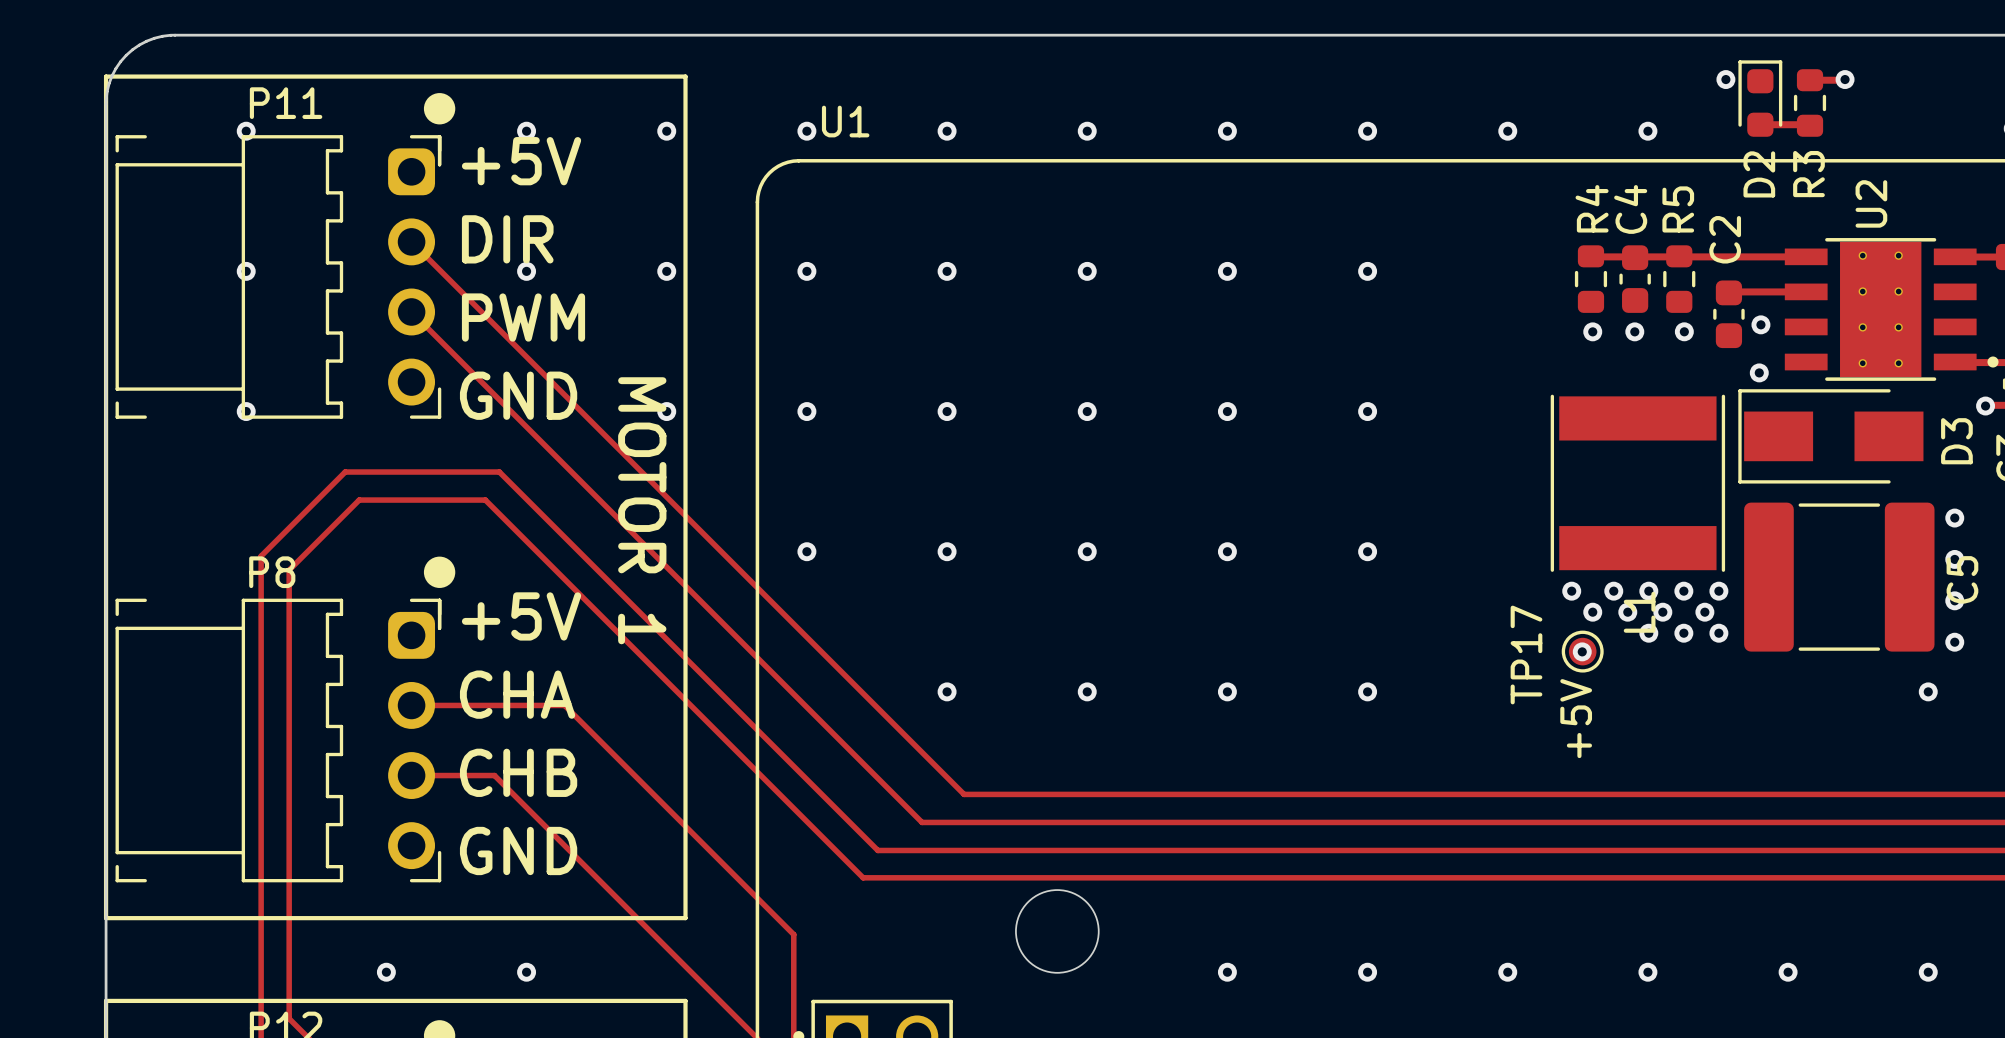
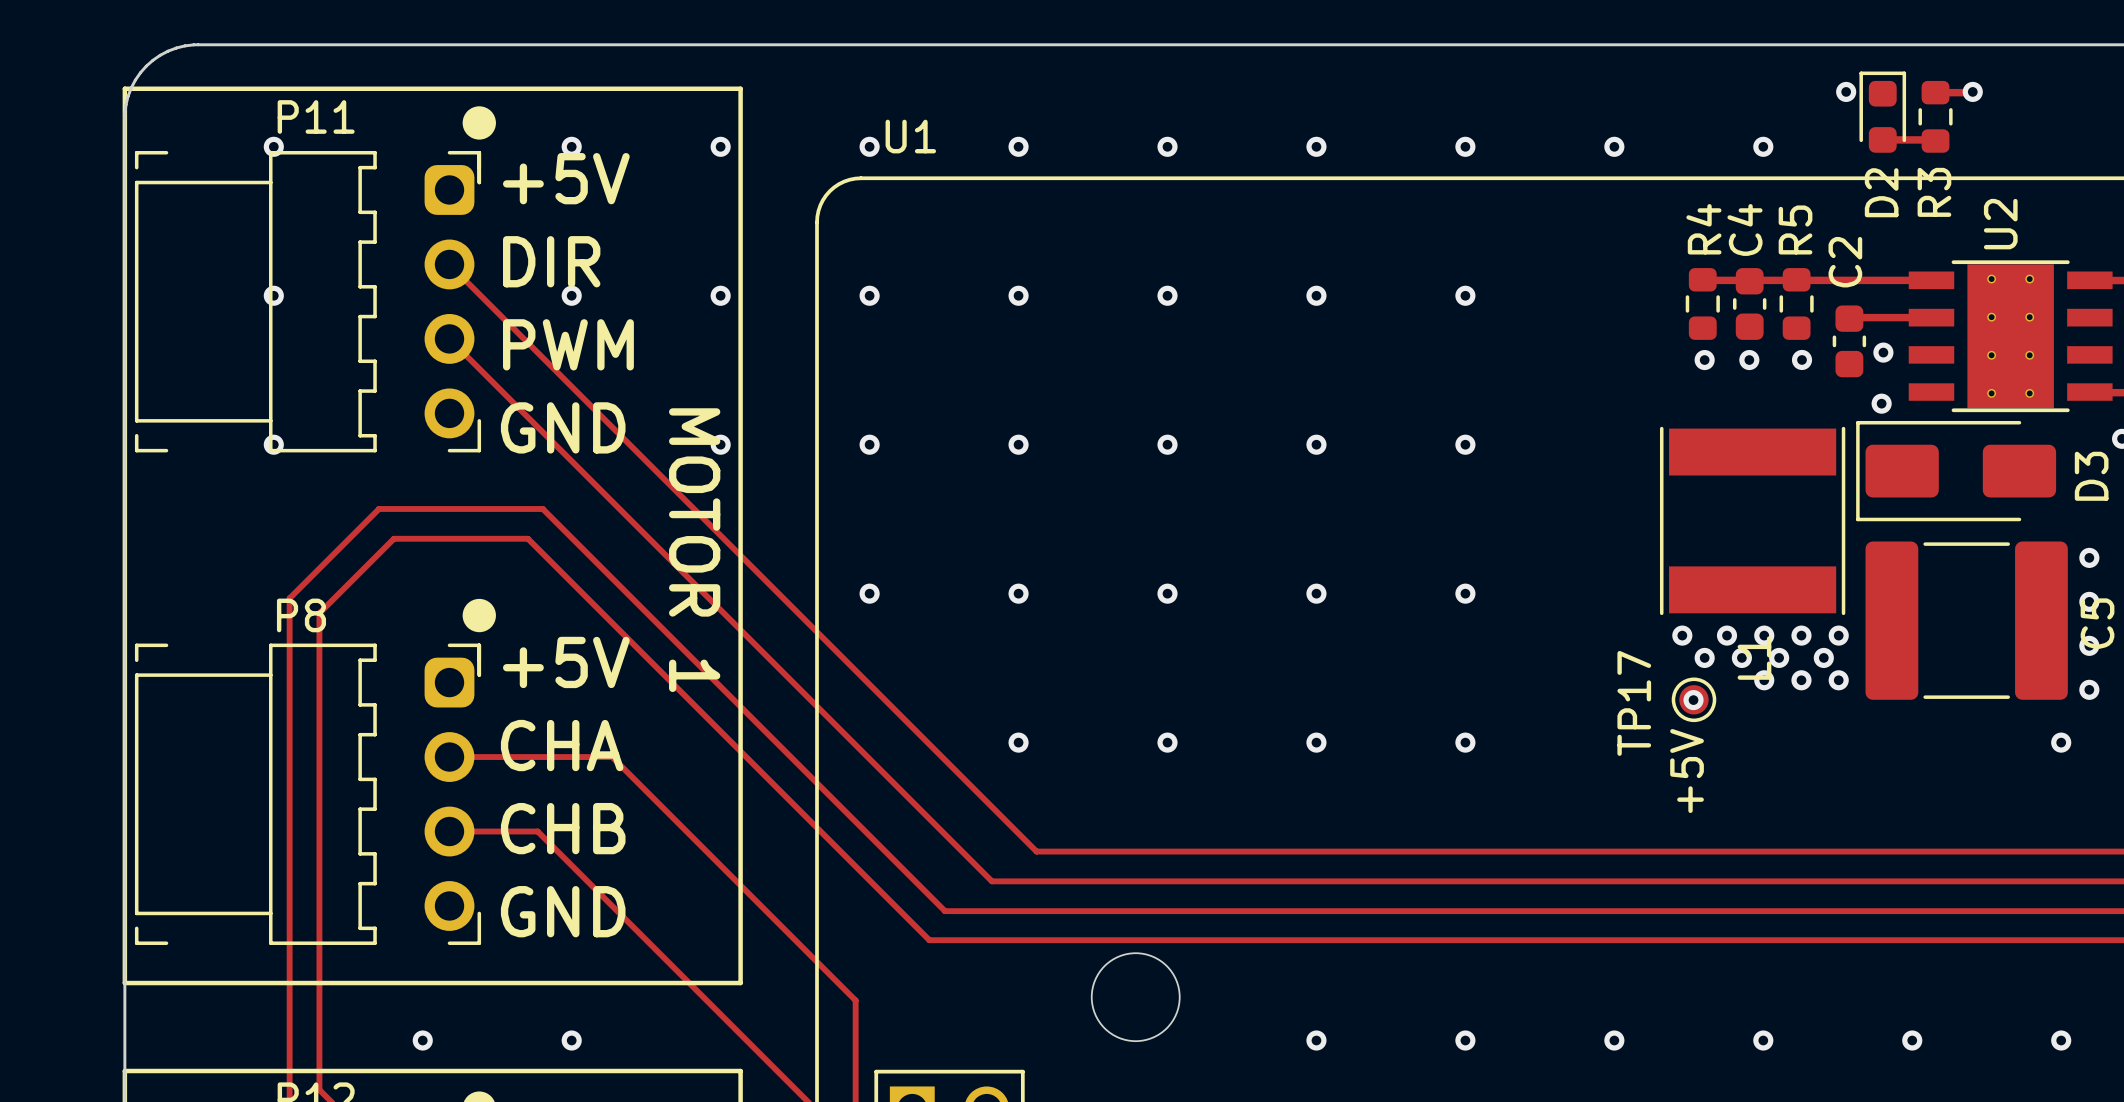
D3 footprint: [1738, 389, 1924, 484] -> [1856, 420, 2057, 522]

